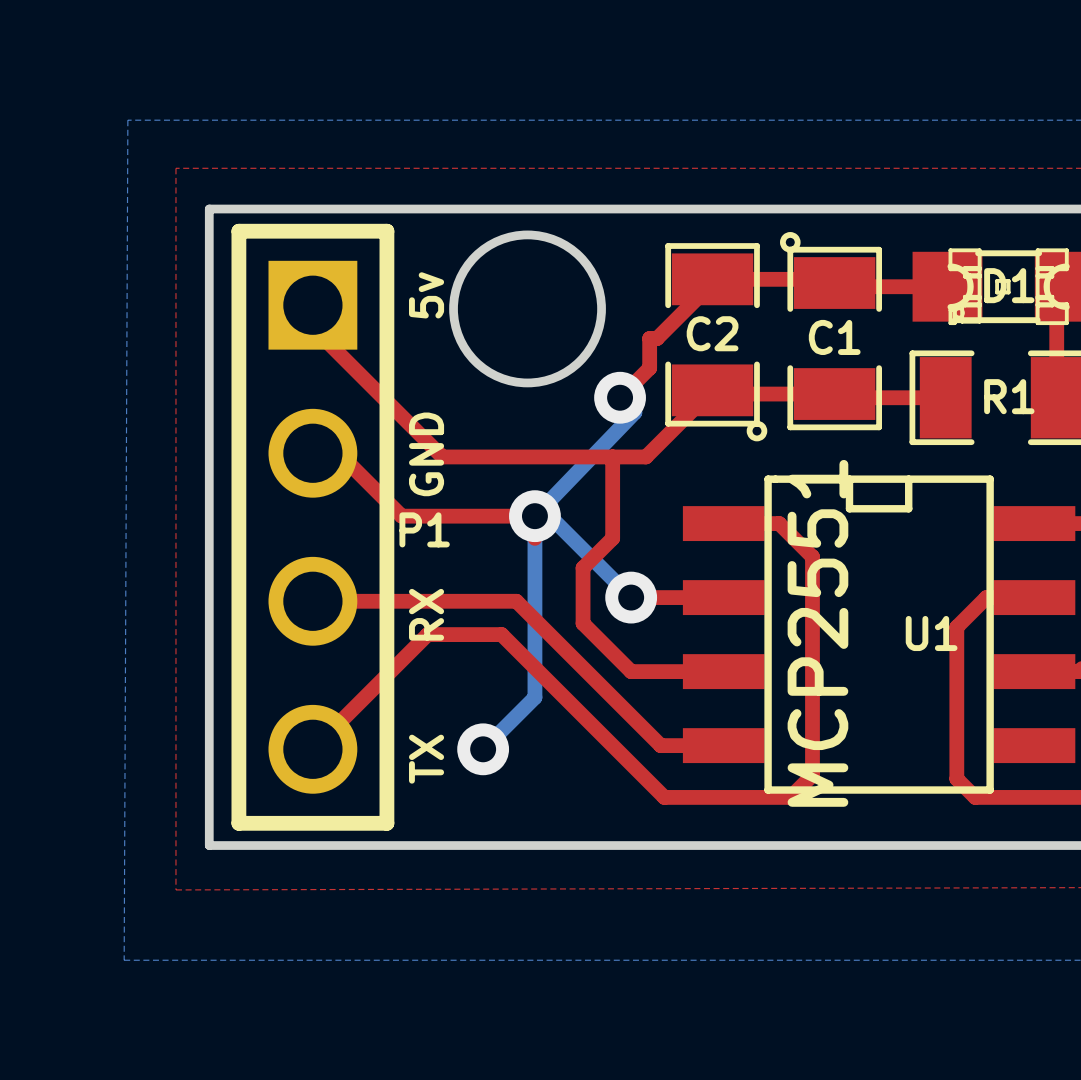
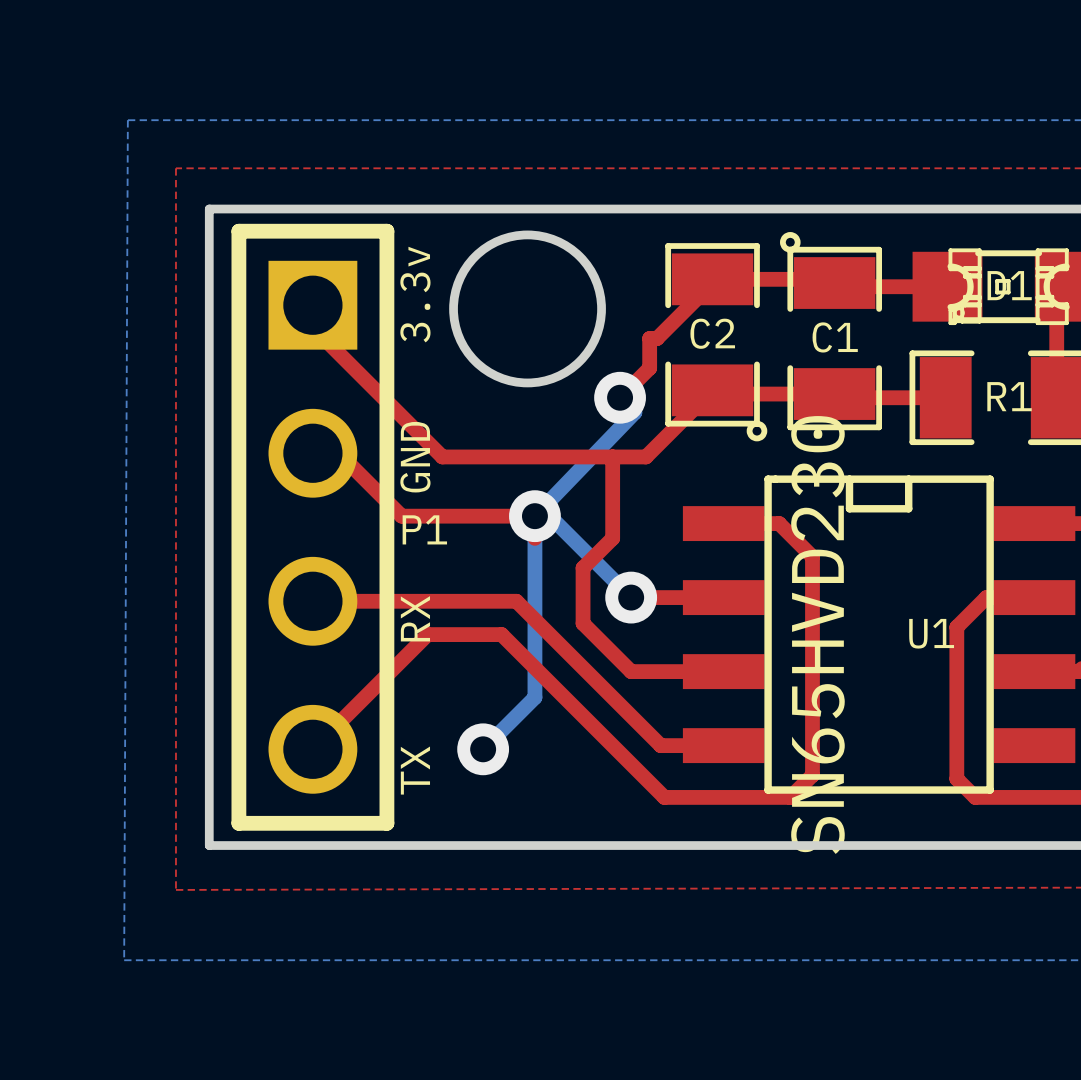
text: TX RX GND 5v (426, 527) -> TX RX GND 3.3v (415, 520)
U1 value: MCP2551 (817, 633) -> SN65HVD230 (817, 634)

